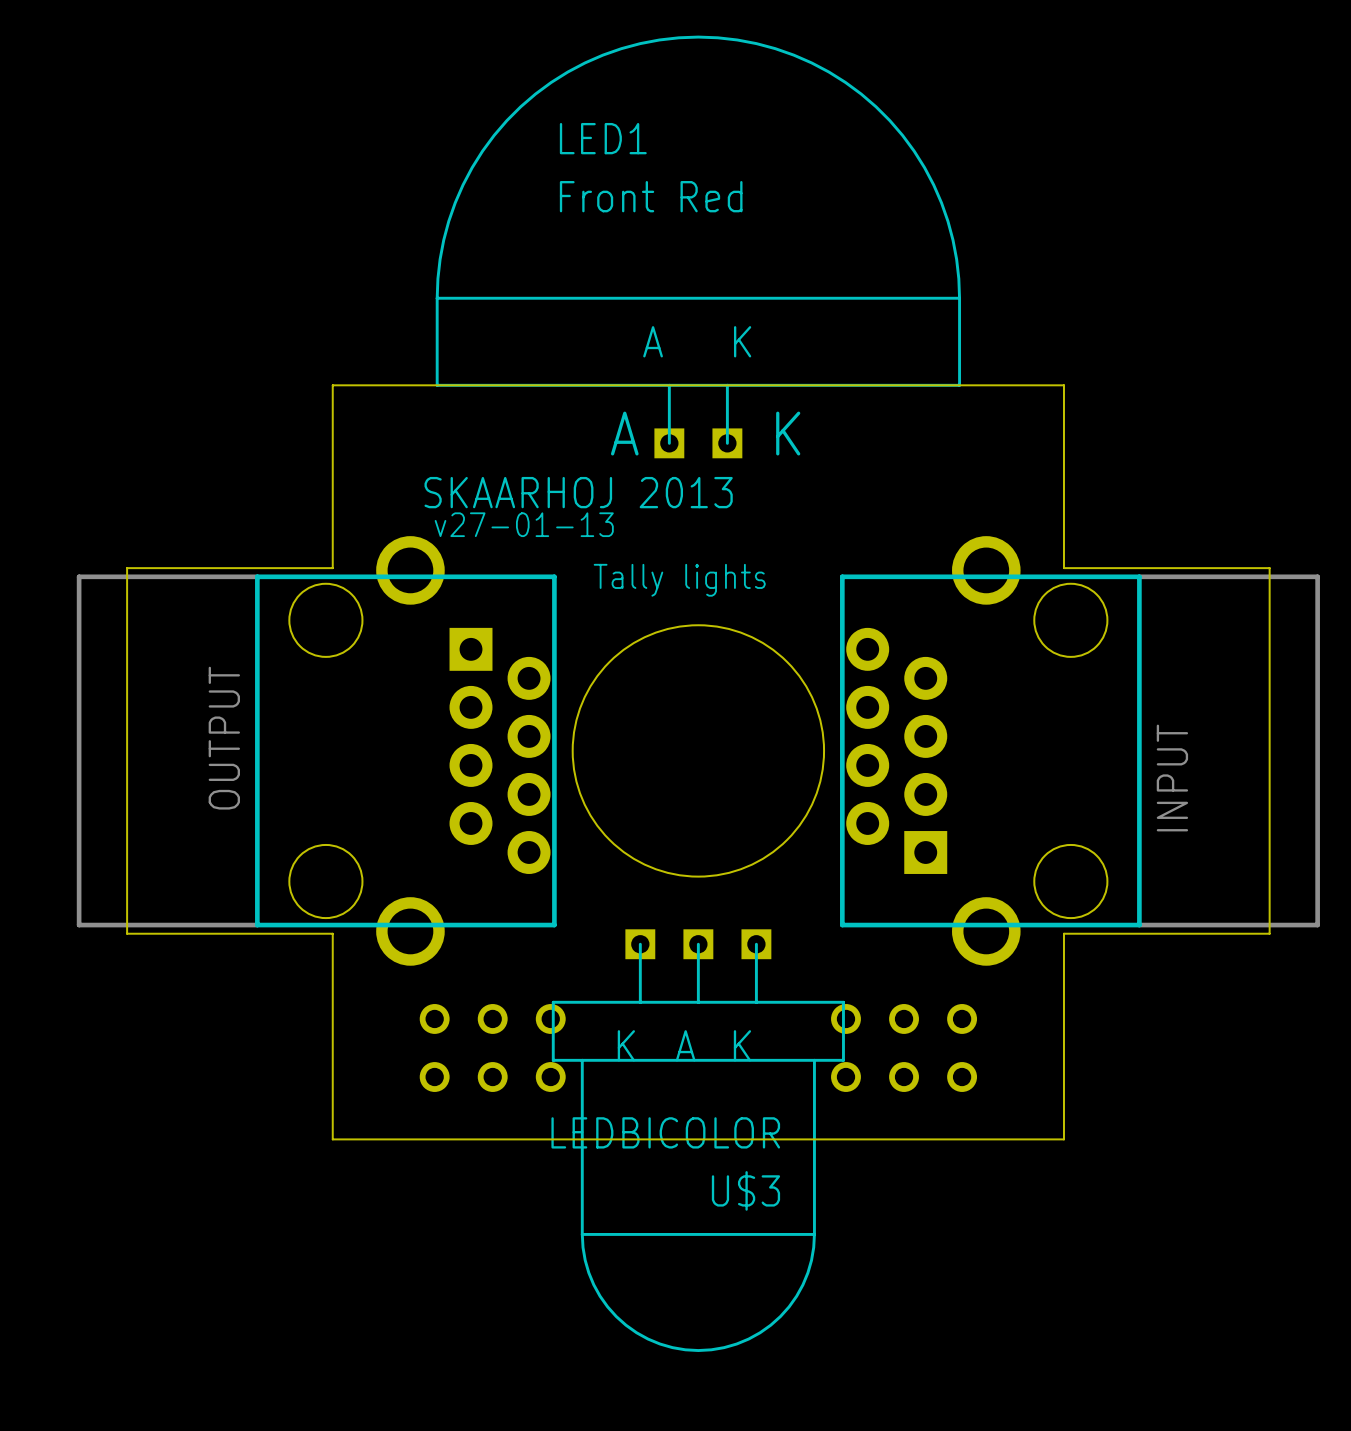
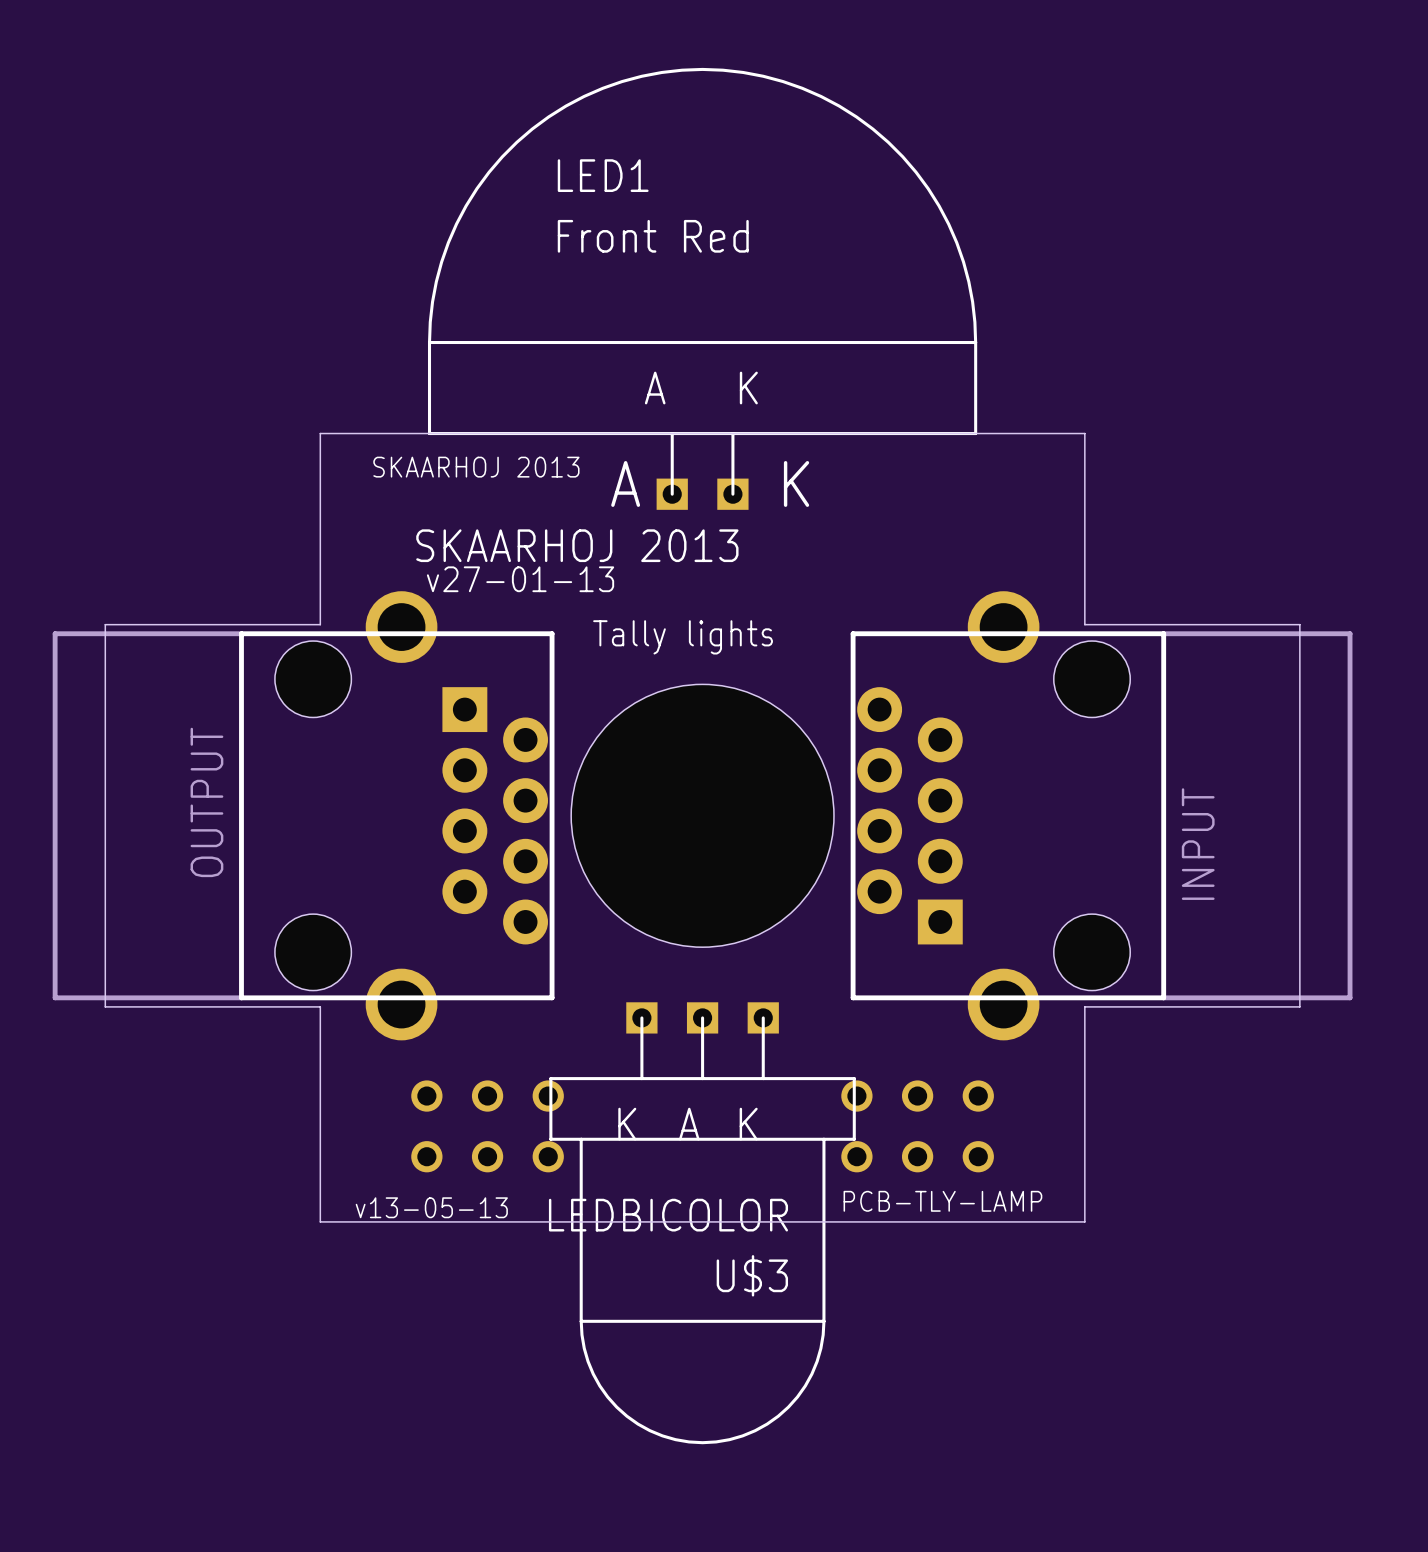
text: none -> SKAARHOJ 2013 (476, 467)
text: none -> PCB-TLY-LAMP (942, 1201)
text: none -> v13-05-13 (431, 1207)

